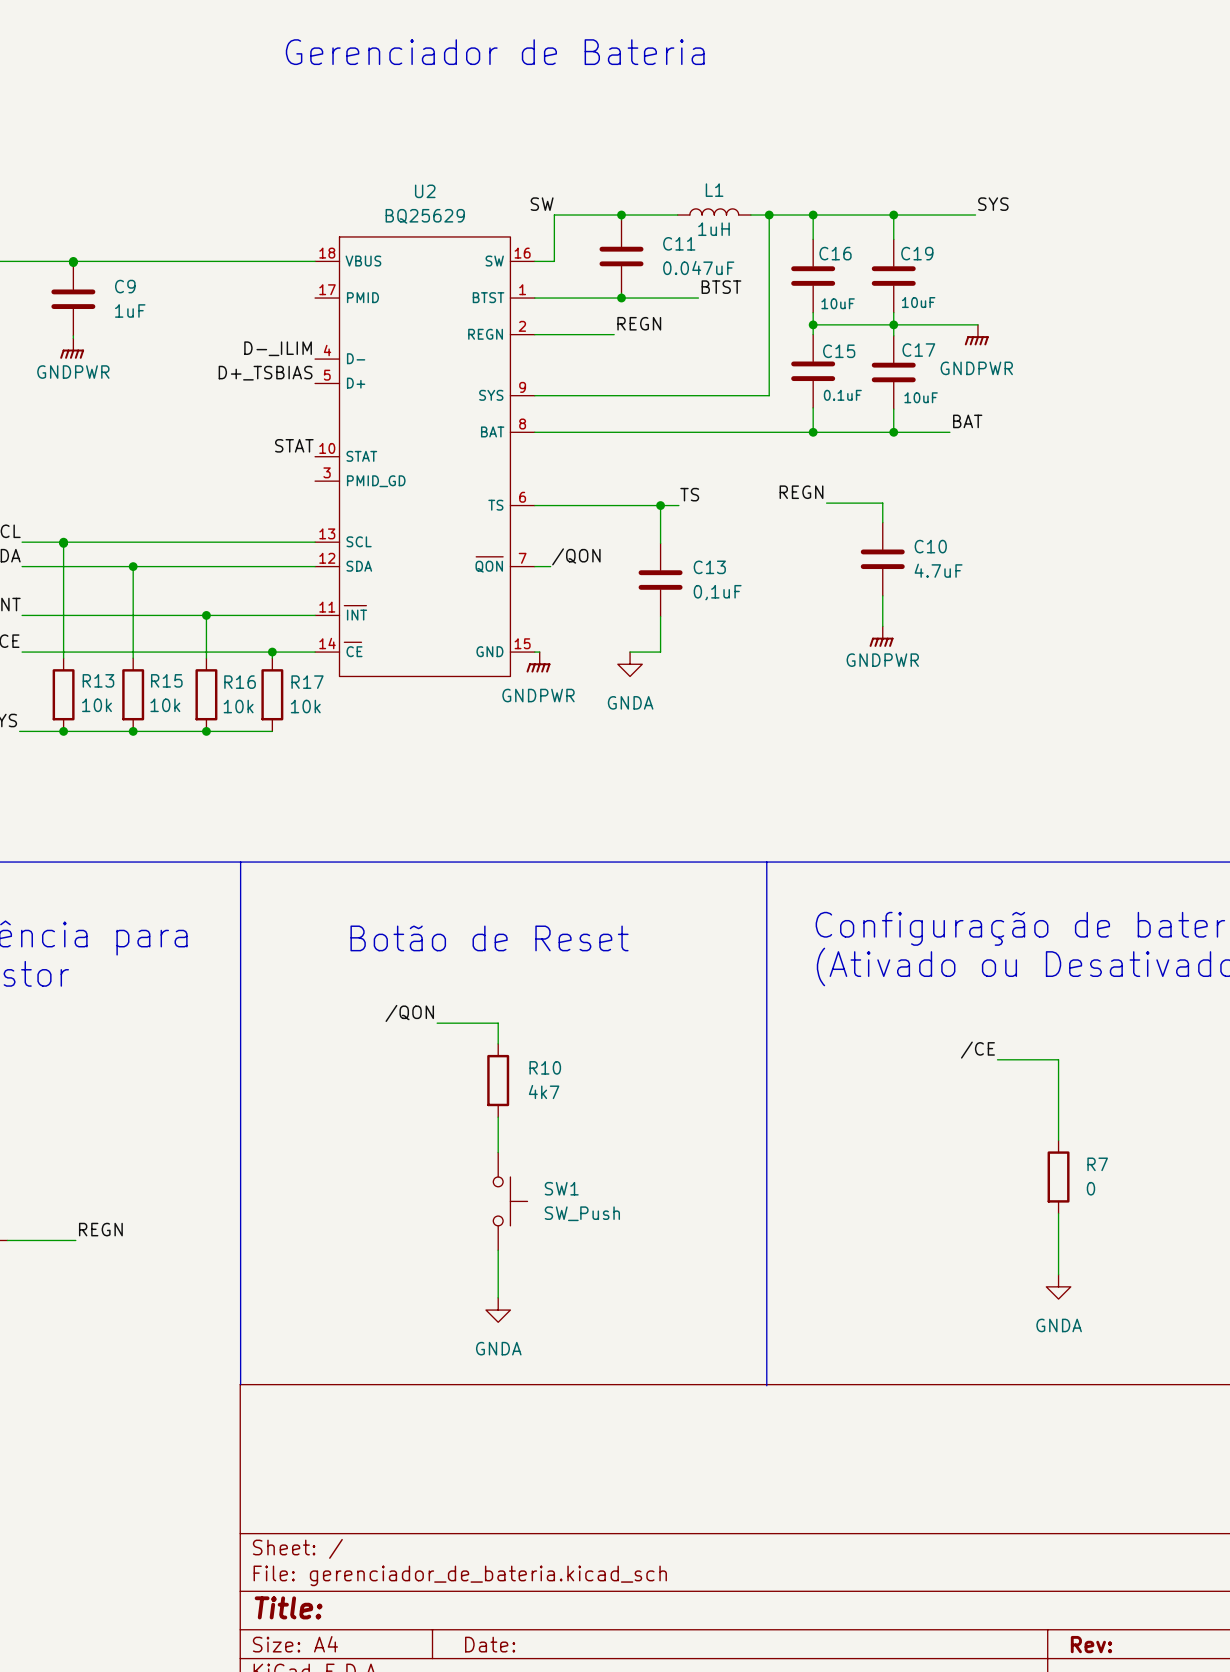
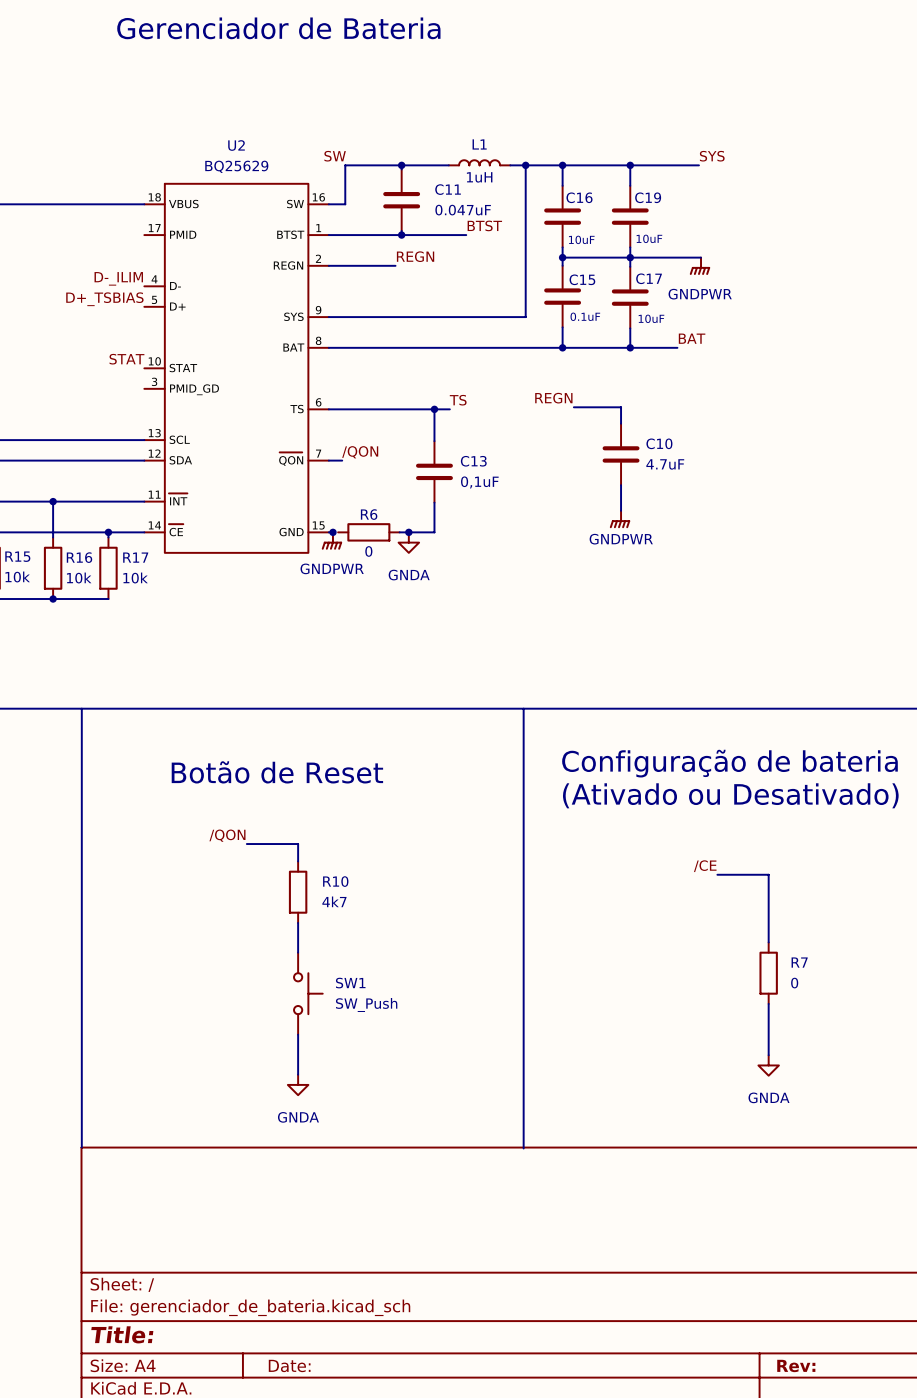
junction: none -> (332, 532)
R6: none -> 0 (368, 532)
wire: none -> (399, 532) (408, 532)
junction: none -> (408, 532)

